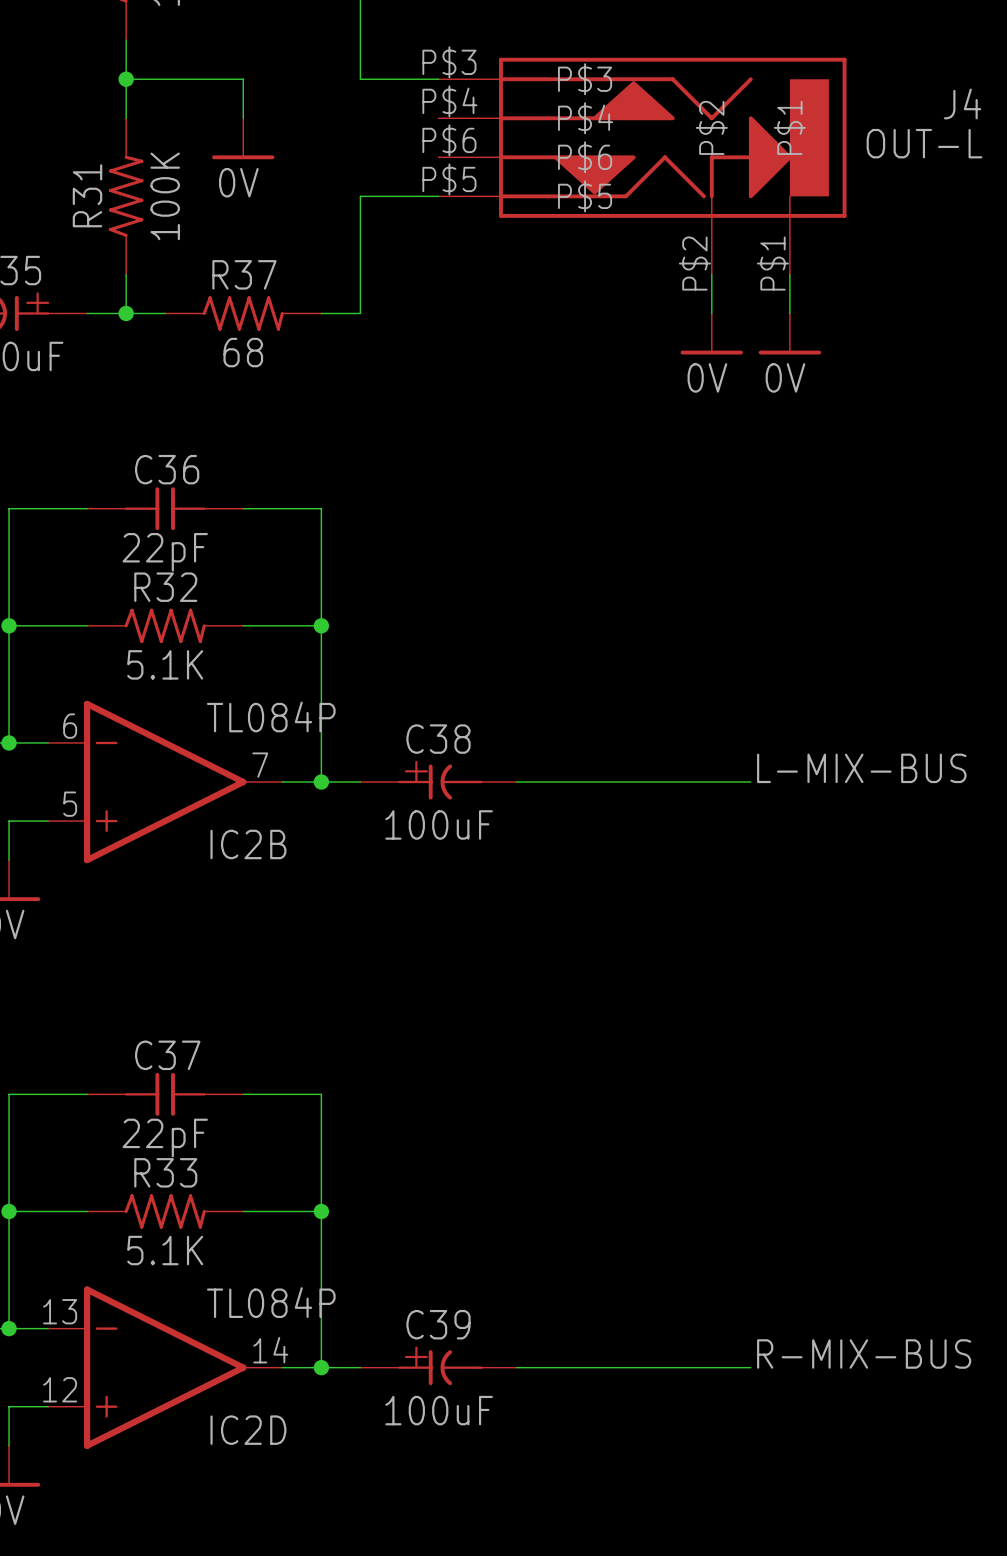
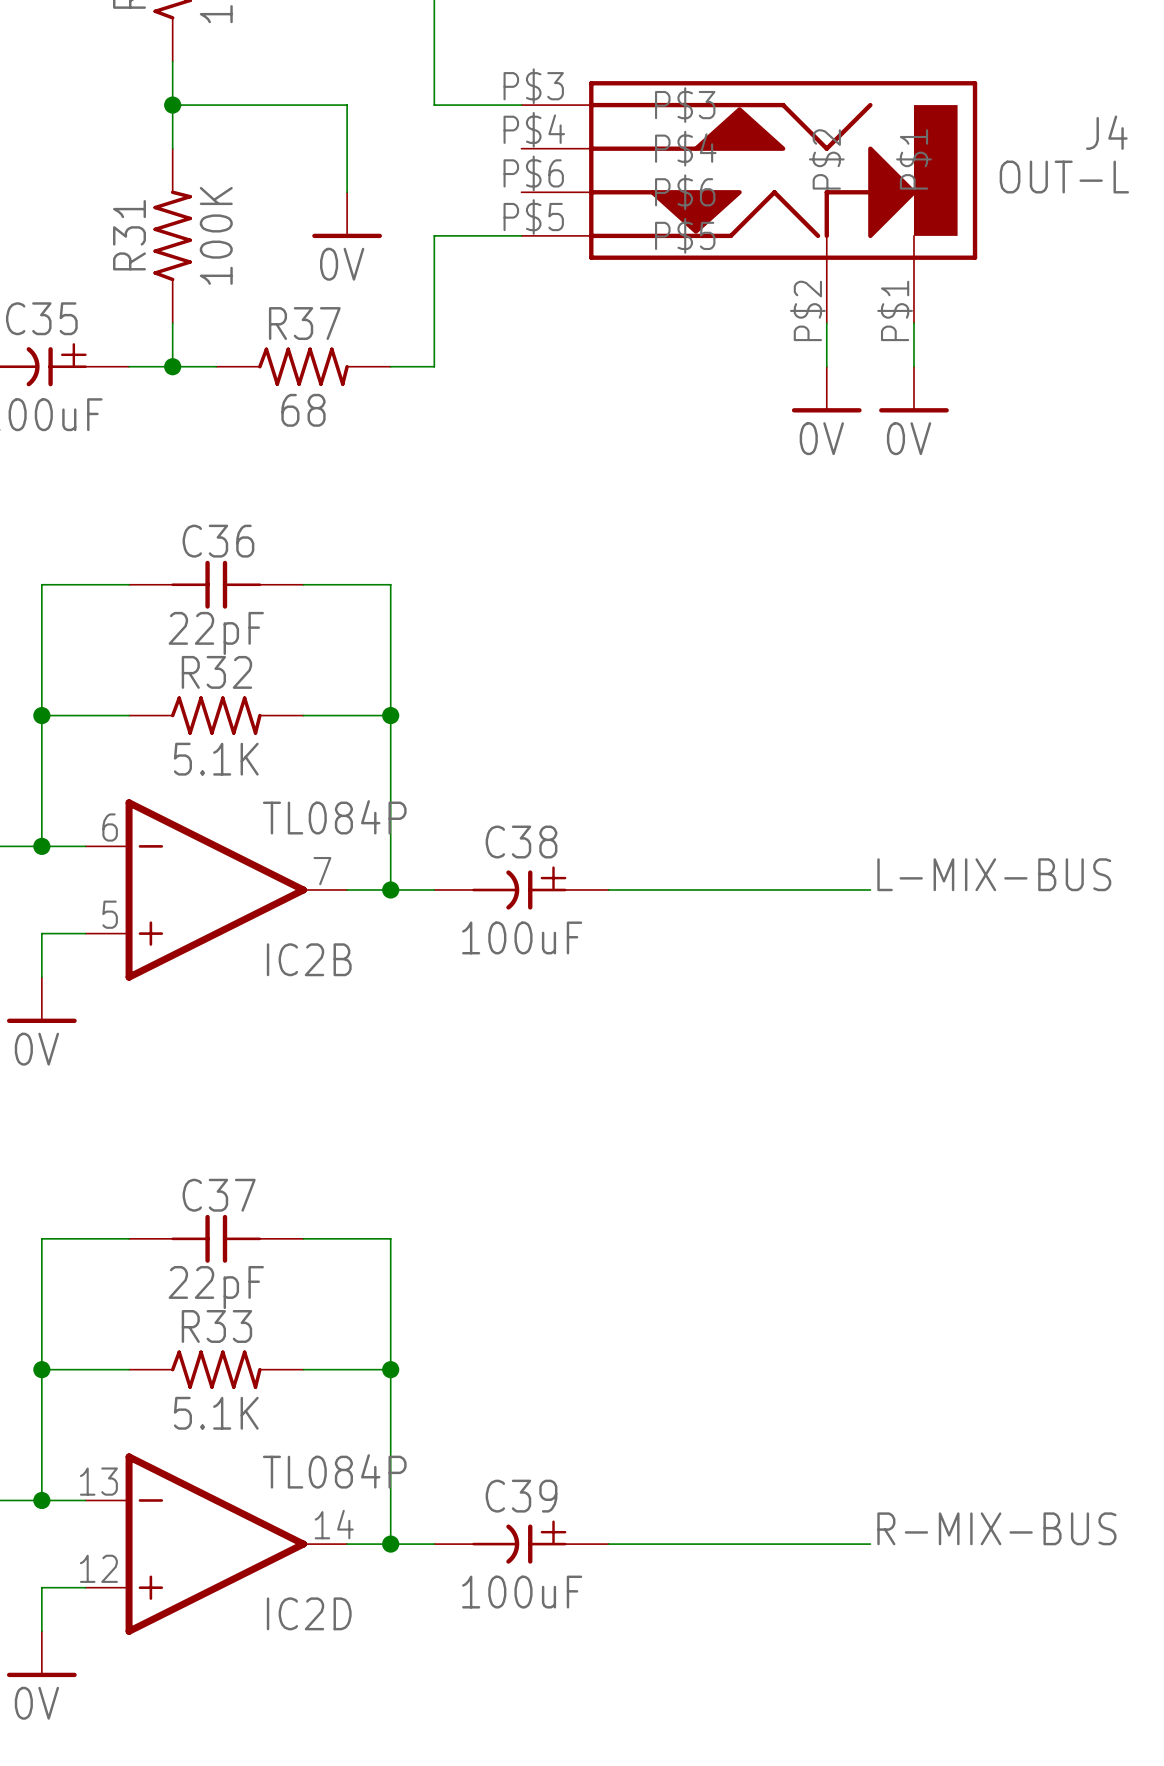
wire: (243, 79) (243, 118) -> (303, 105) (347, 105) (347, 192)
power symbol position: 0V (243, 138) -> 0V (347, 215)
C38 symbol: [360, 764, 517, 800] -> [434, 870, 609, 910]
C39 symbol: [360, 1350, 517, 1386] -> [434, 1524, 609, 1564]

